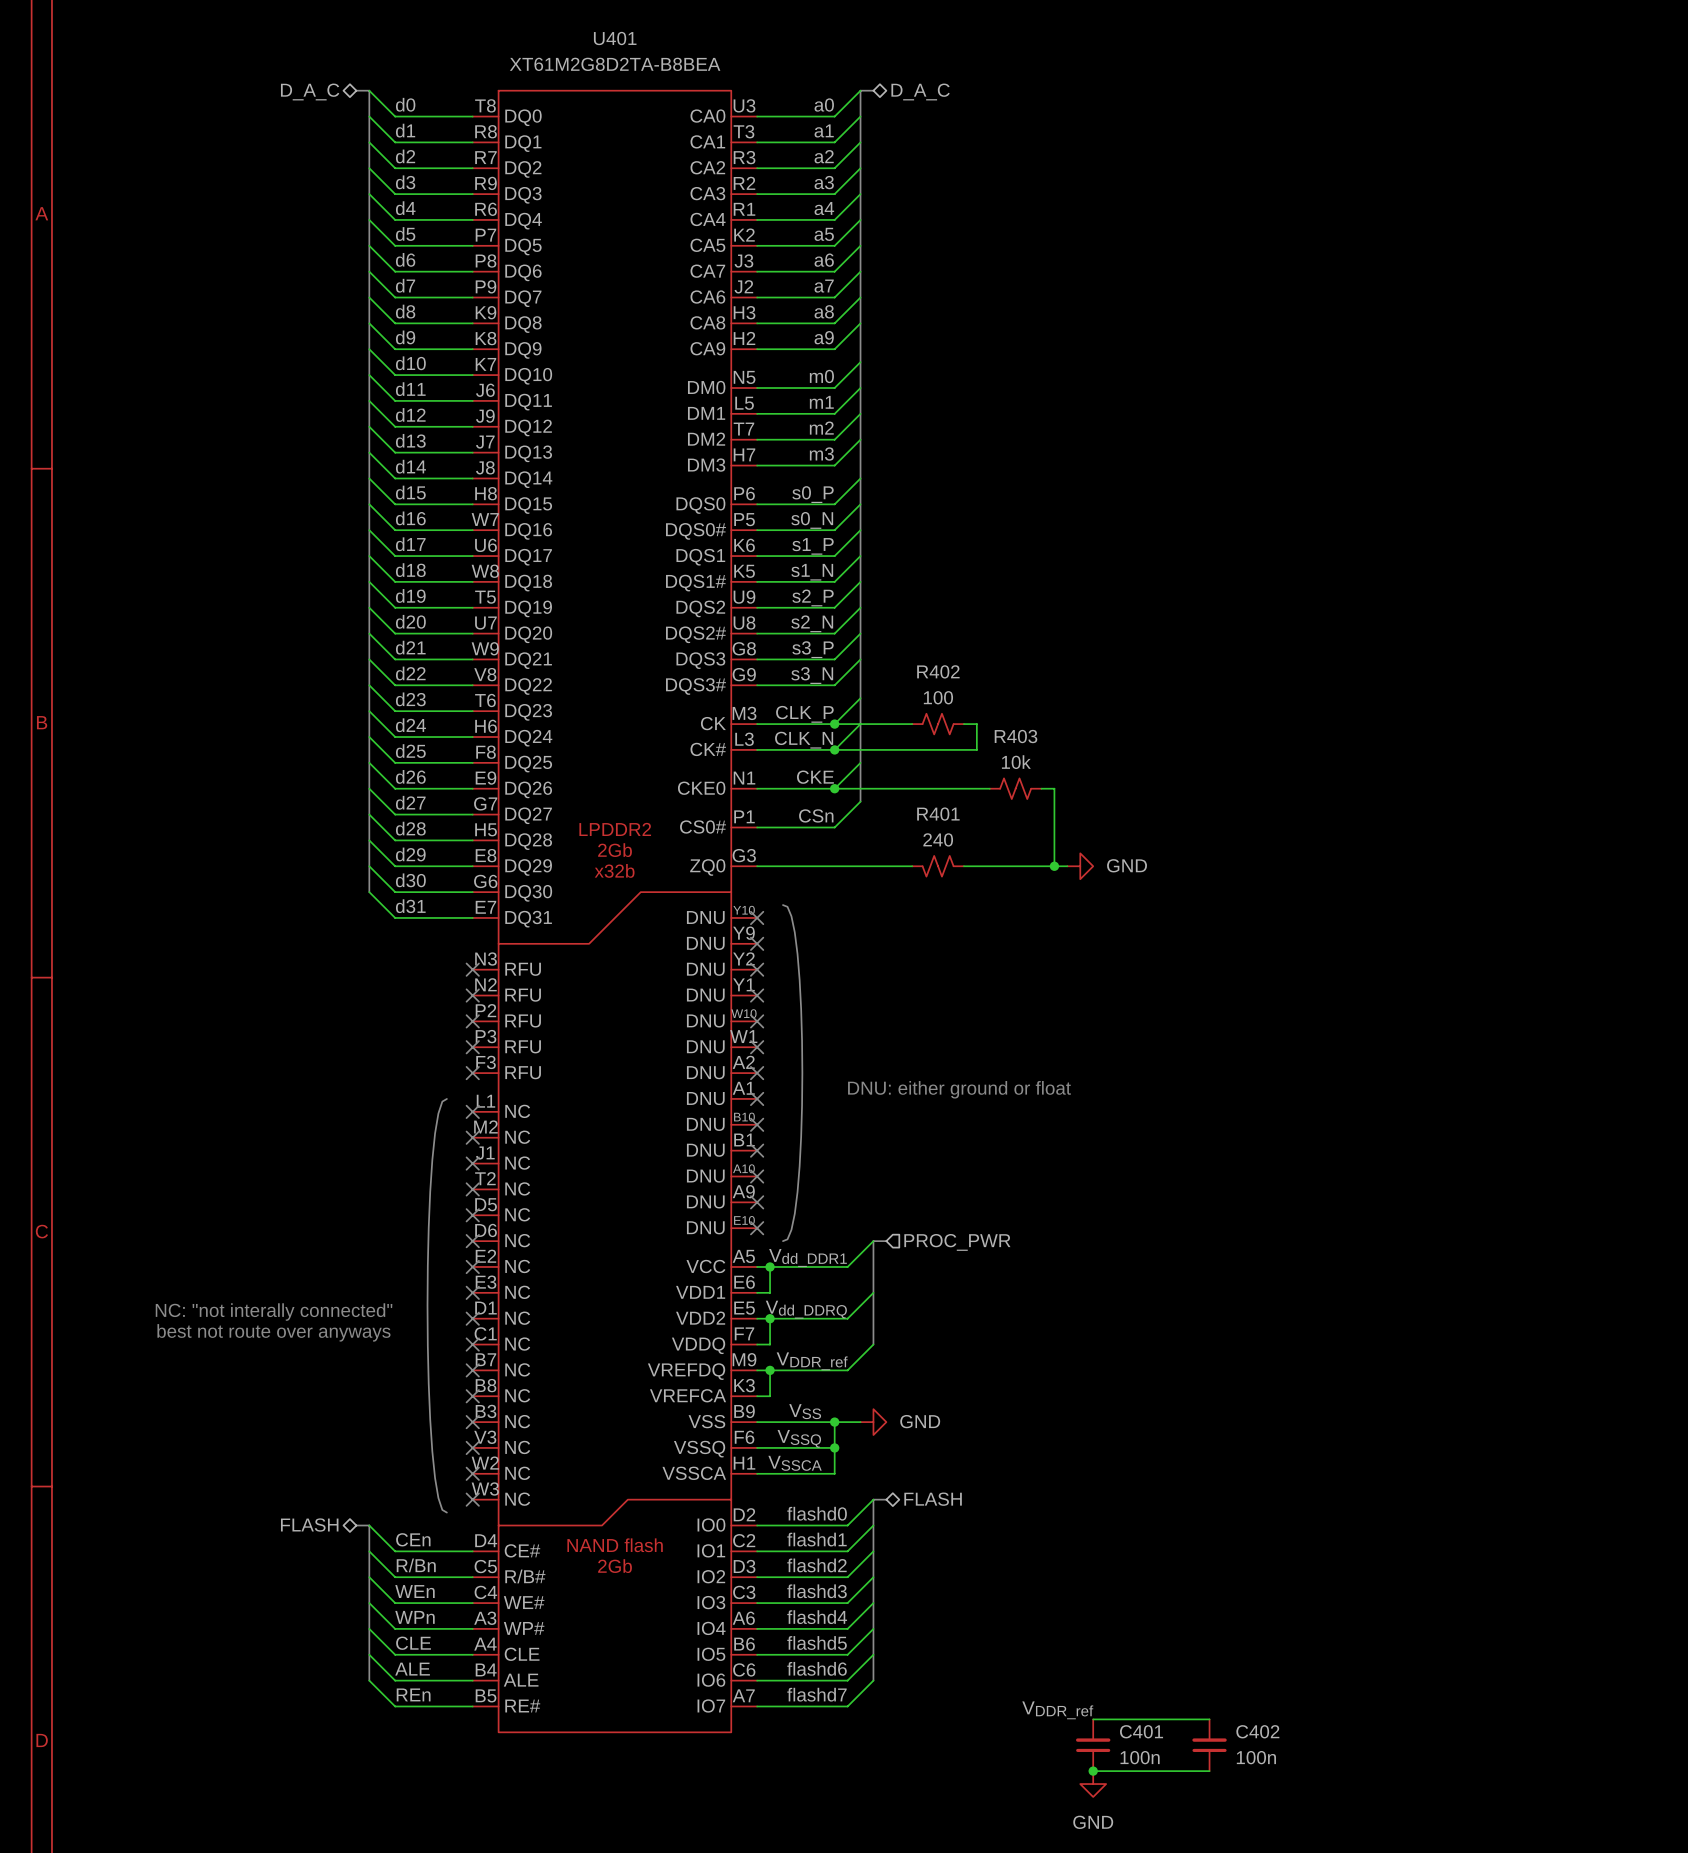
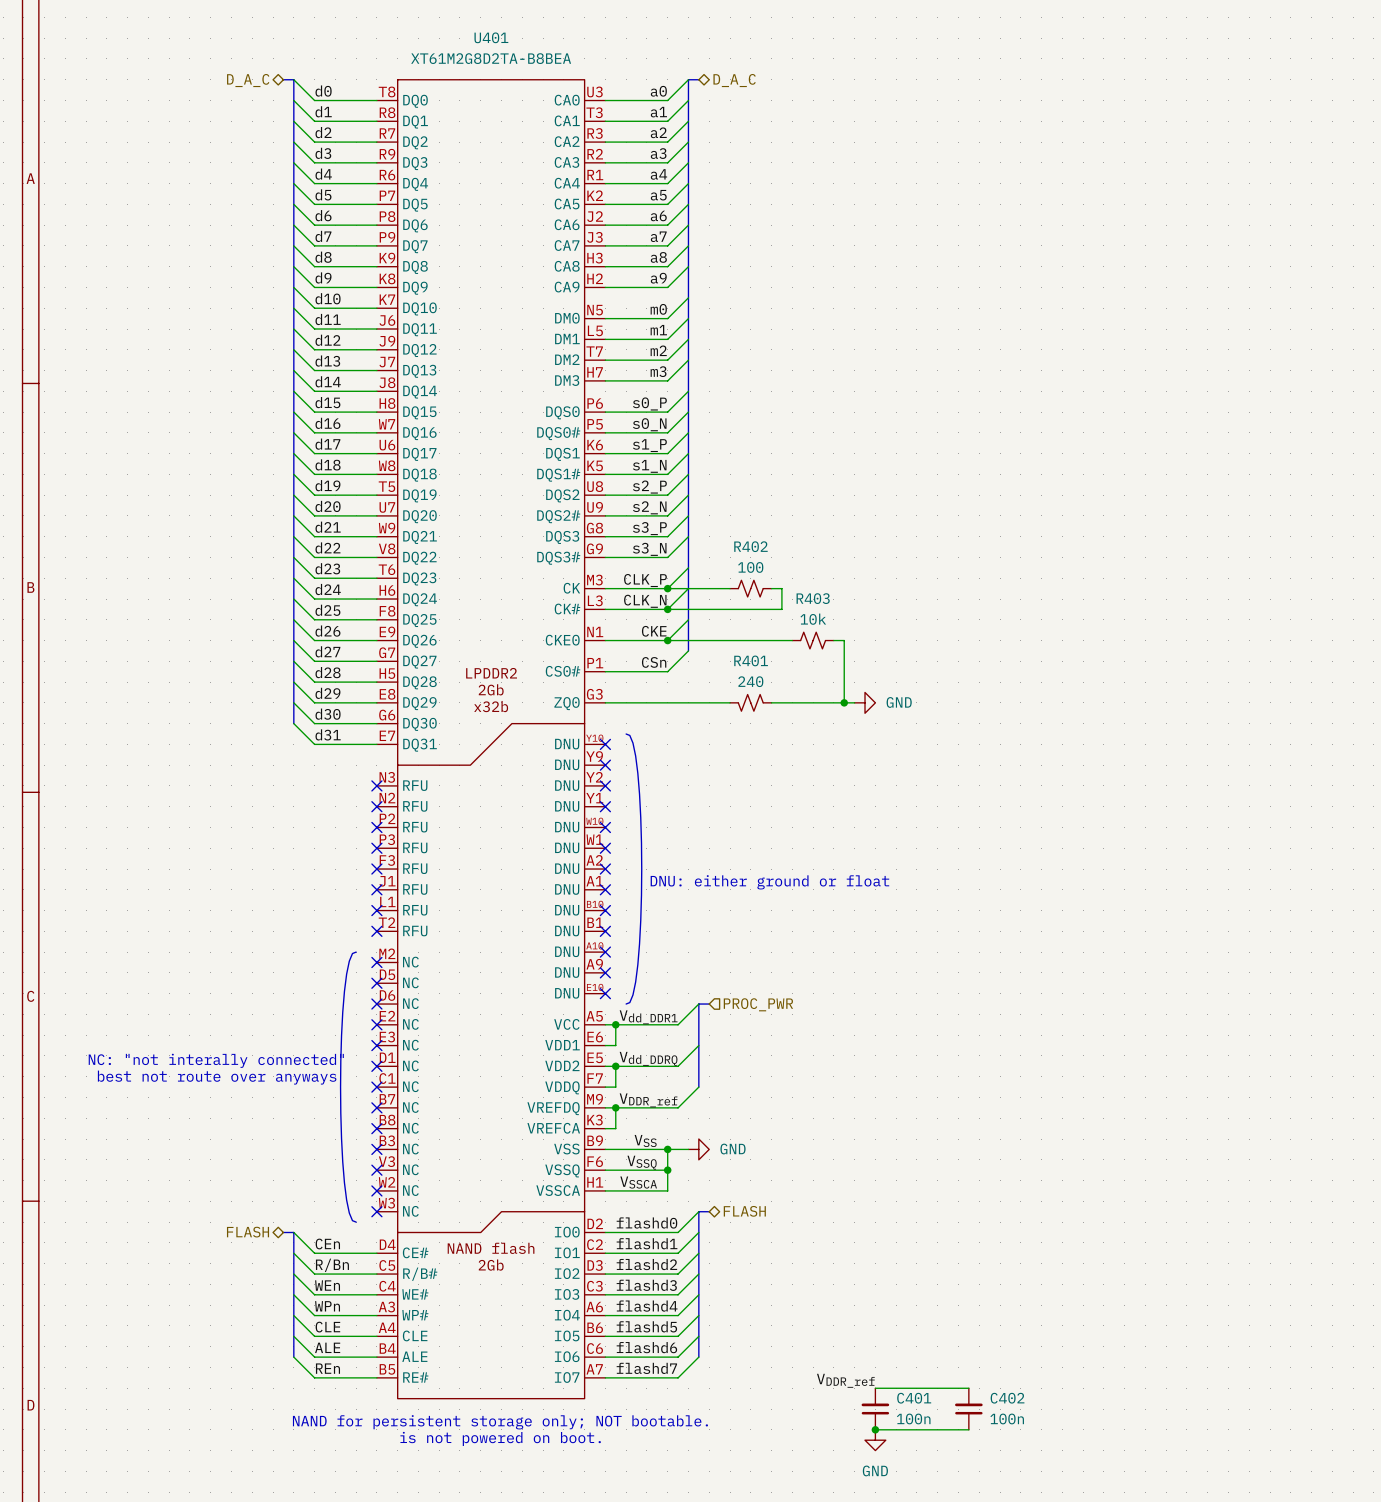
U401 symbol: [472, 90, 758, 1733] -> [376, 79, 606, 1399]
line: (446, 1098) (442, 1101) (438, 1113) (432, 1159) (427, 1305) (432, 1451) (438, 1497) (442, 1509) (446, 1512) -> (356, 952) (352, 953) (349, 961) (344, 991) (340, 1087) (344, 1182) (349, 1213) (352, 1220) (356, 1222)
no-connect mark: none -> (376, 889)
no-connect mark: (472, 1111) -> none
no-connect mark: none -> (376, 910)
no-connect mark: (472, 1137) -> none
no-connect mark: none -> (376, 931)
no-connect mark: (472, 1163) -> none
text: none -> NAND for persistent storage only; NOT bootable. (500, 1422)
text: none -> is not powered on boot. (500, 1438)

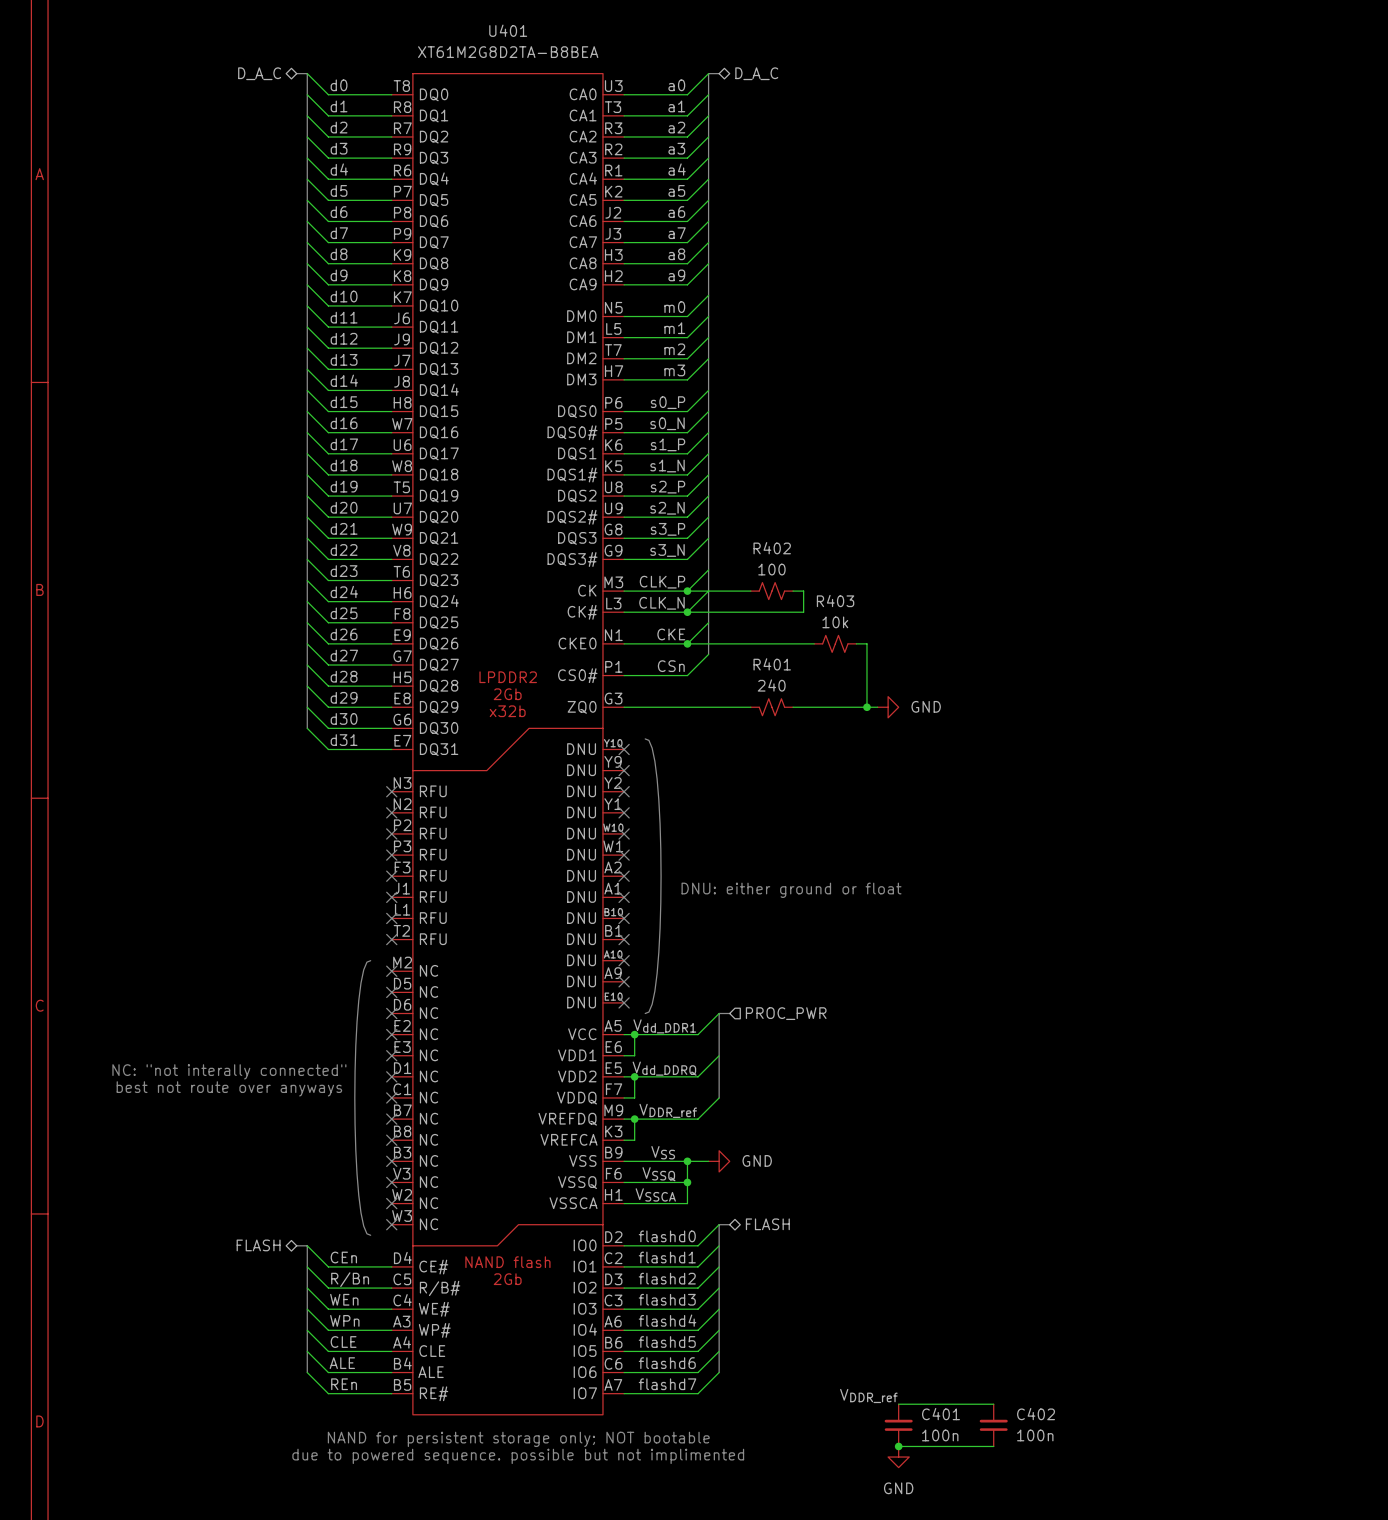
text: NAND for persistent storage only; NOT bootable. (500, 1422) -> NAND for persistent storage only; NOT bootable (518, 1439)
text: is not powered on boot. (500, 1438) -> due to powered sequence. possible but not implimented (518, 1456)

